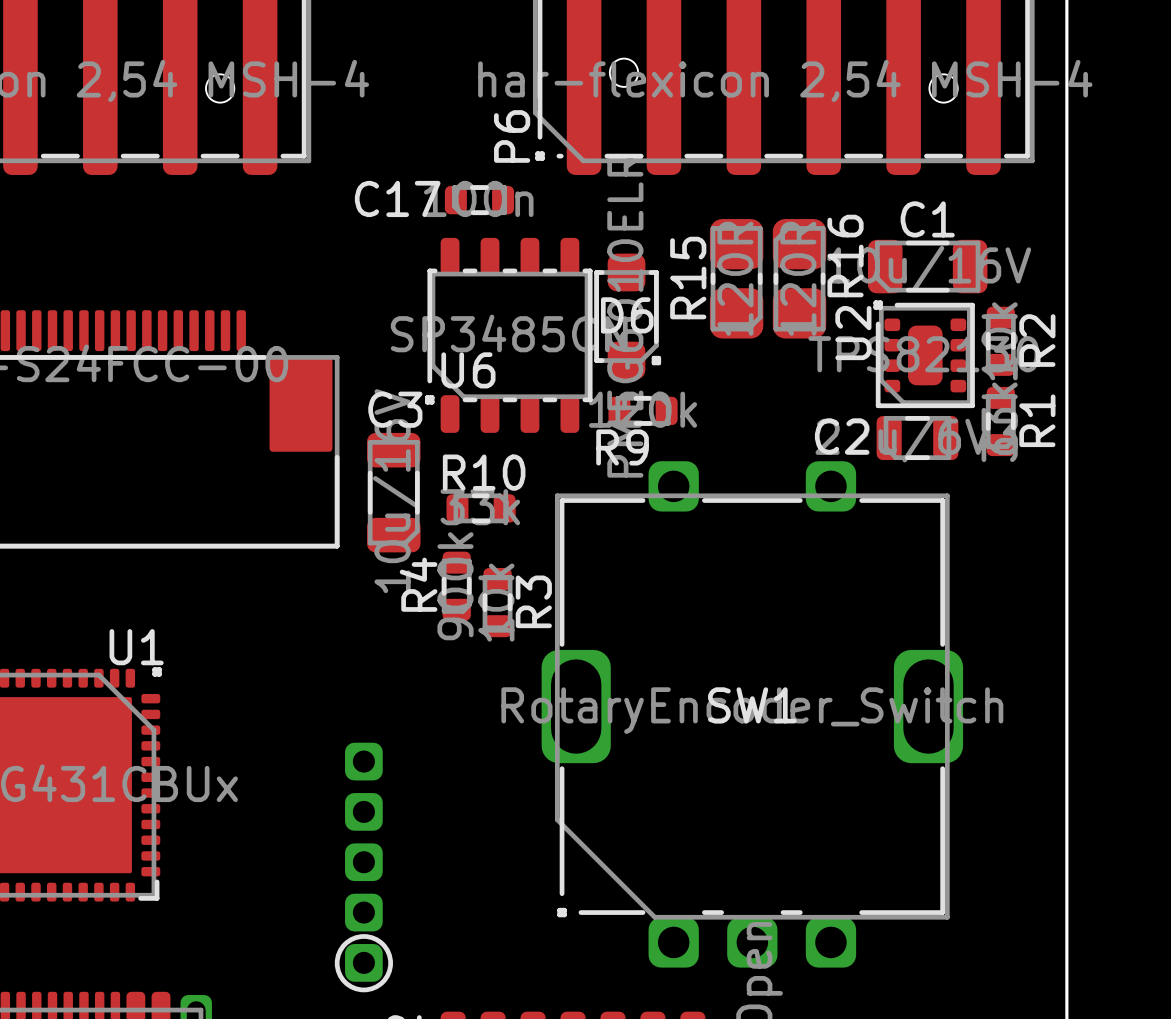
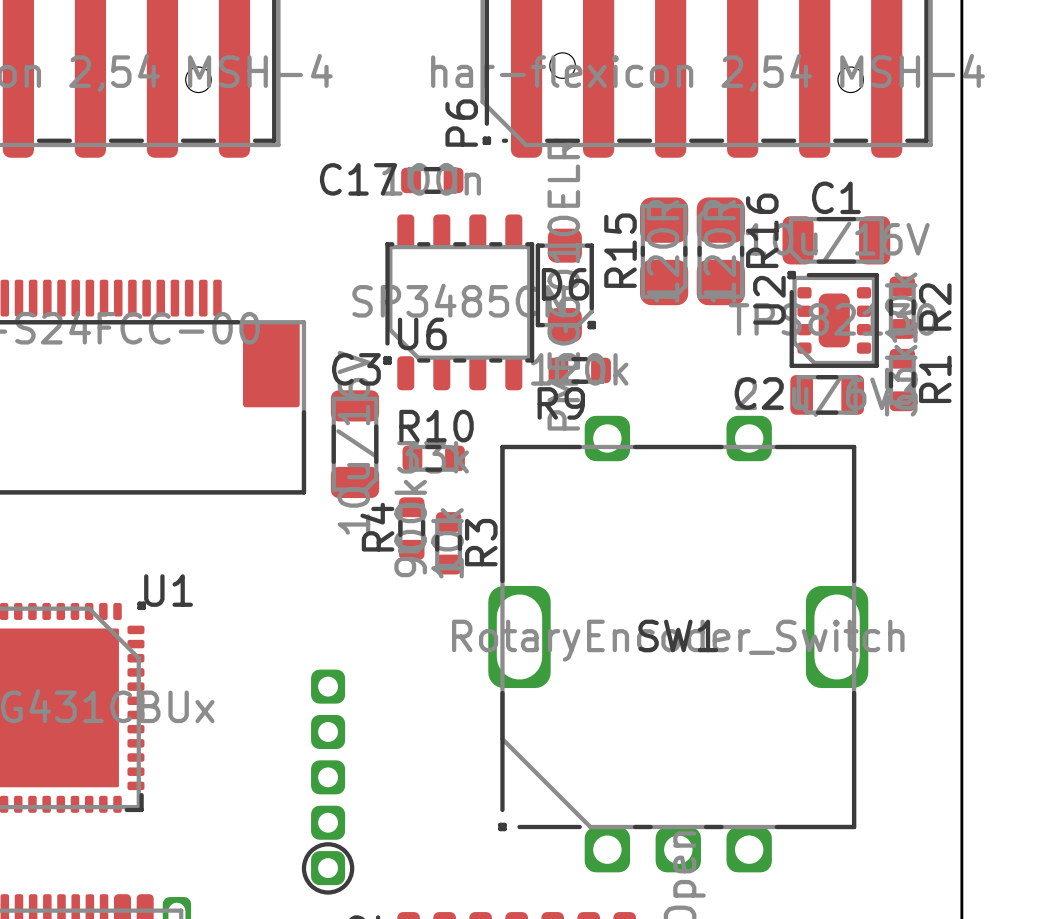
SW1 footprint: [541, 461, 964, 968] -> [488, 415, 869, 873]
U1 name position: U1 (136, 647) -> U1 (168, 590)

